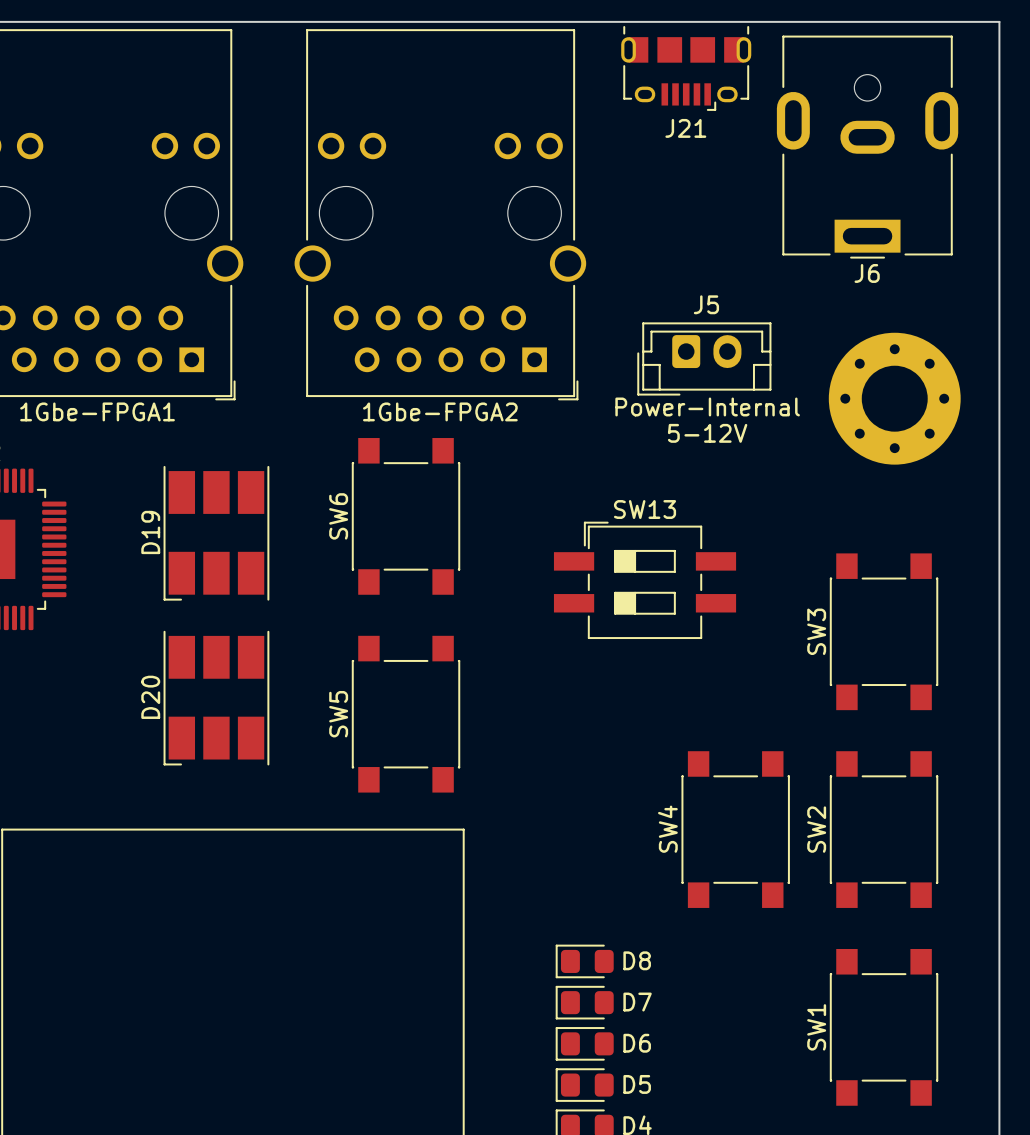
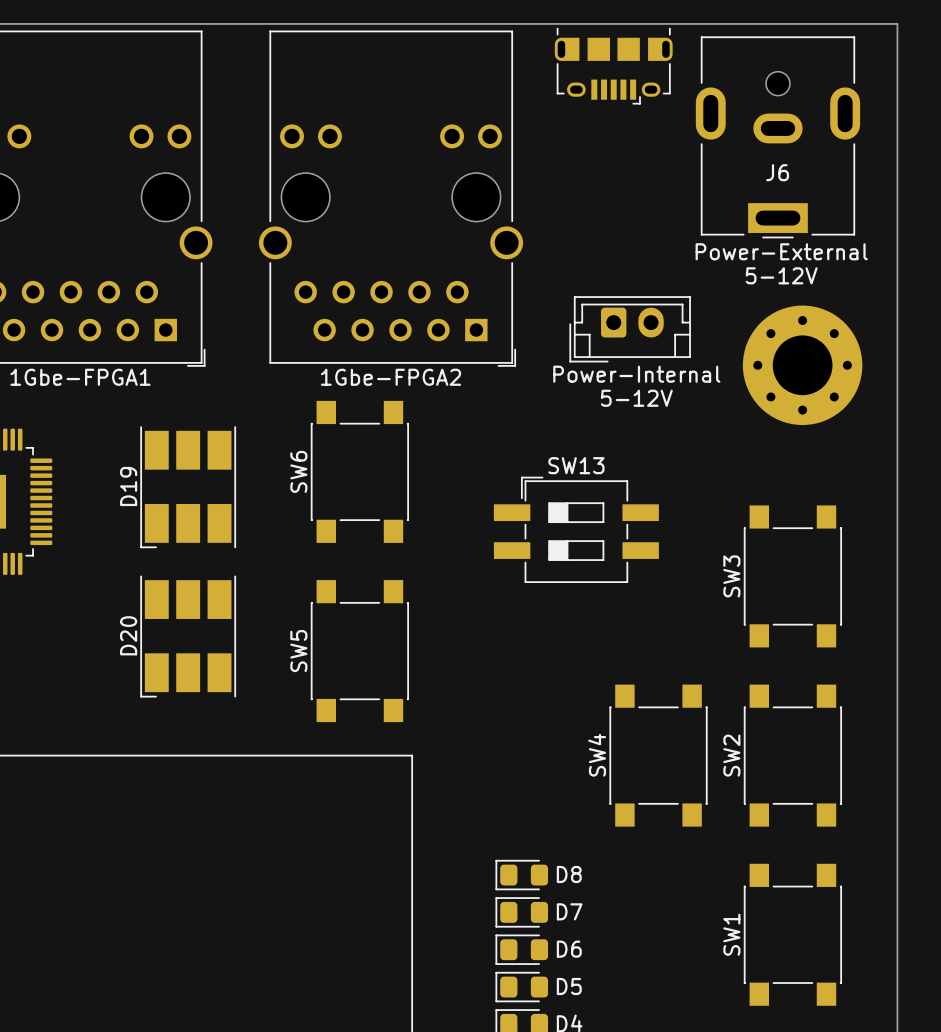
J21 name: J21 (685, 128) -> none
J6 name position: J6 (867, 273) -> J6 (777, 172)
text: none -> Power-External (781, 251)
text: none -> 5-12V (781, 275)
J5 name: J5 (706, 304) -> none
J5 value: Power-Internal (707, 406) -> none
text: none -> Power-Internal (636, 374)
J5 text: 5-12V (707, 433) -> none
text: none -> 5-12V (636, 398)

